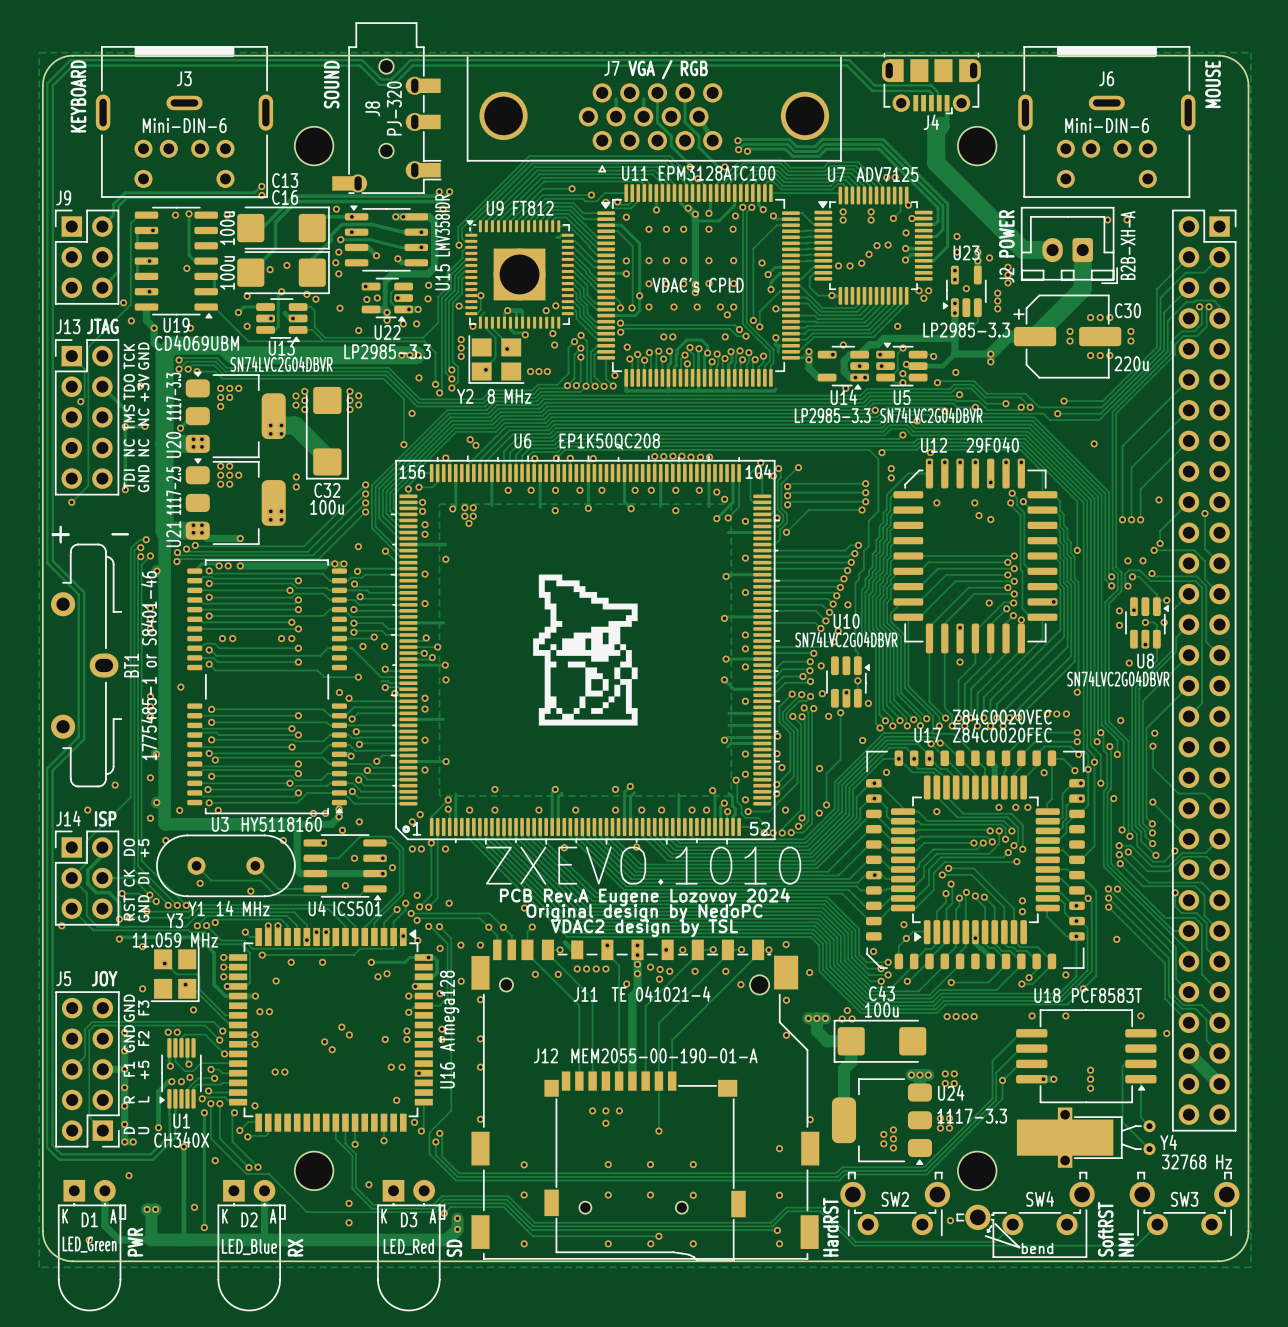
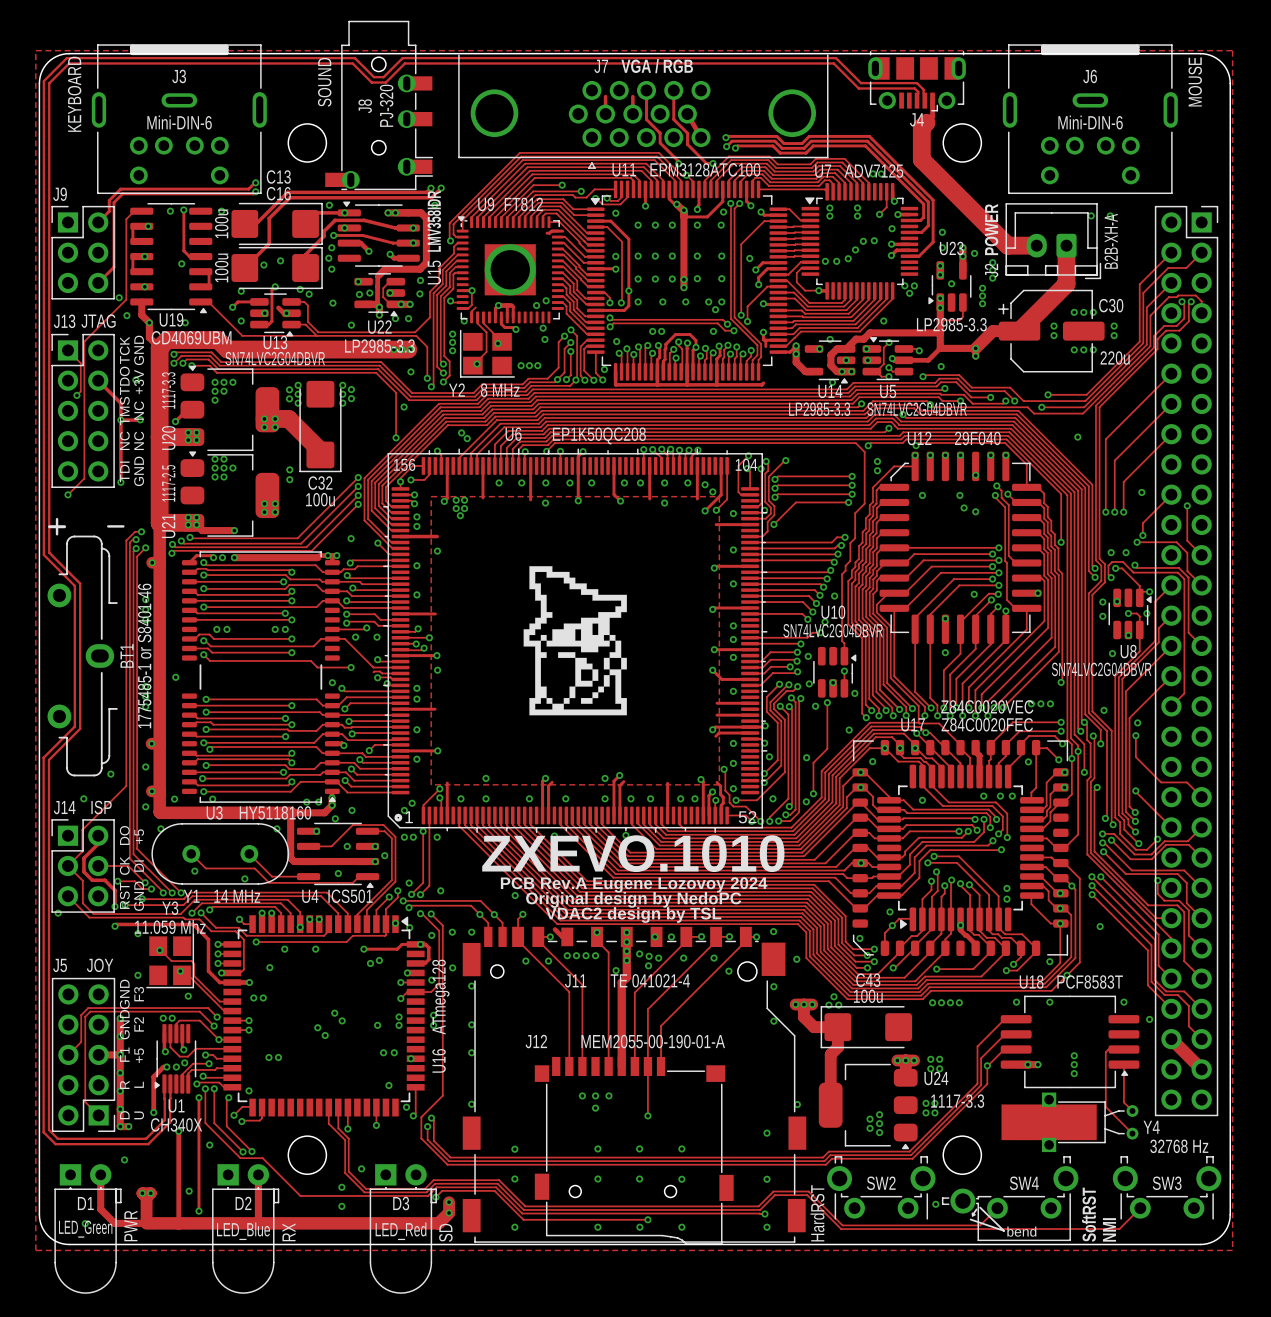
text: VDAC's CPLD (698, 285) -> none
Y3 text: 11.059 MHz (175, 940) -> 11.059 Mhz (170, 926)
D1 text: K (65, 1216) -> none
D1 text: A (113, 1216) -> none
D2 text: K (225, 1216) -> none
D2 text: A (273, 1216) -> none
D3 text: K (384, 1216) -> none
D3 text: A (432, 1216) -> none

